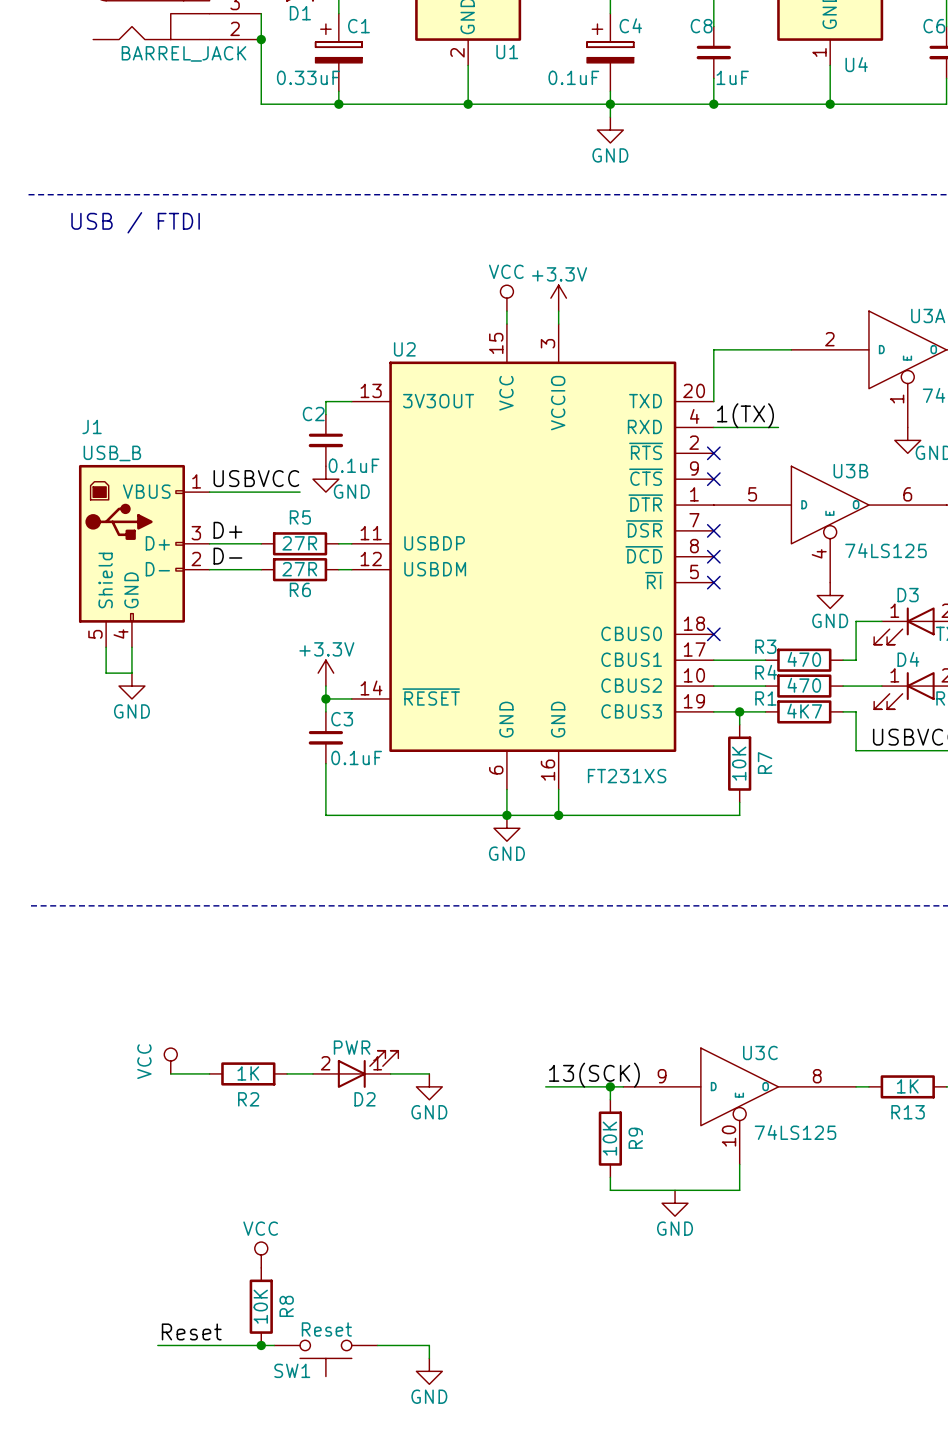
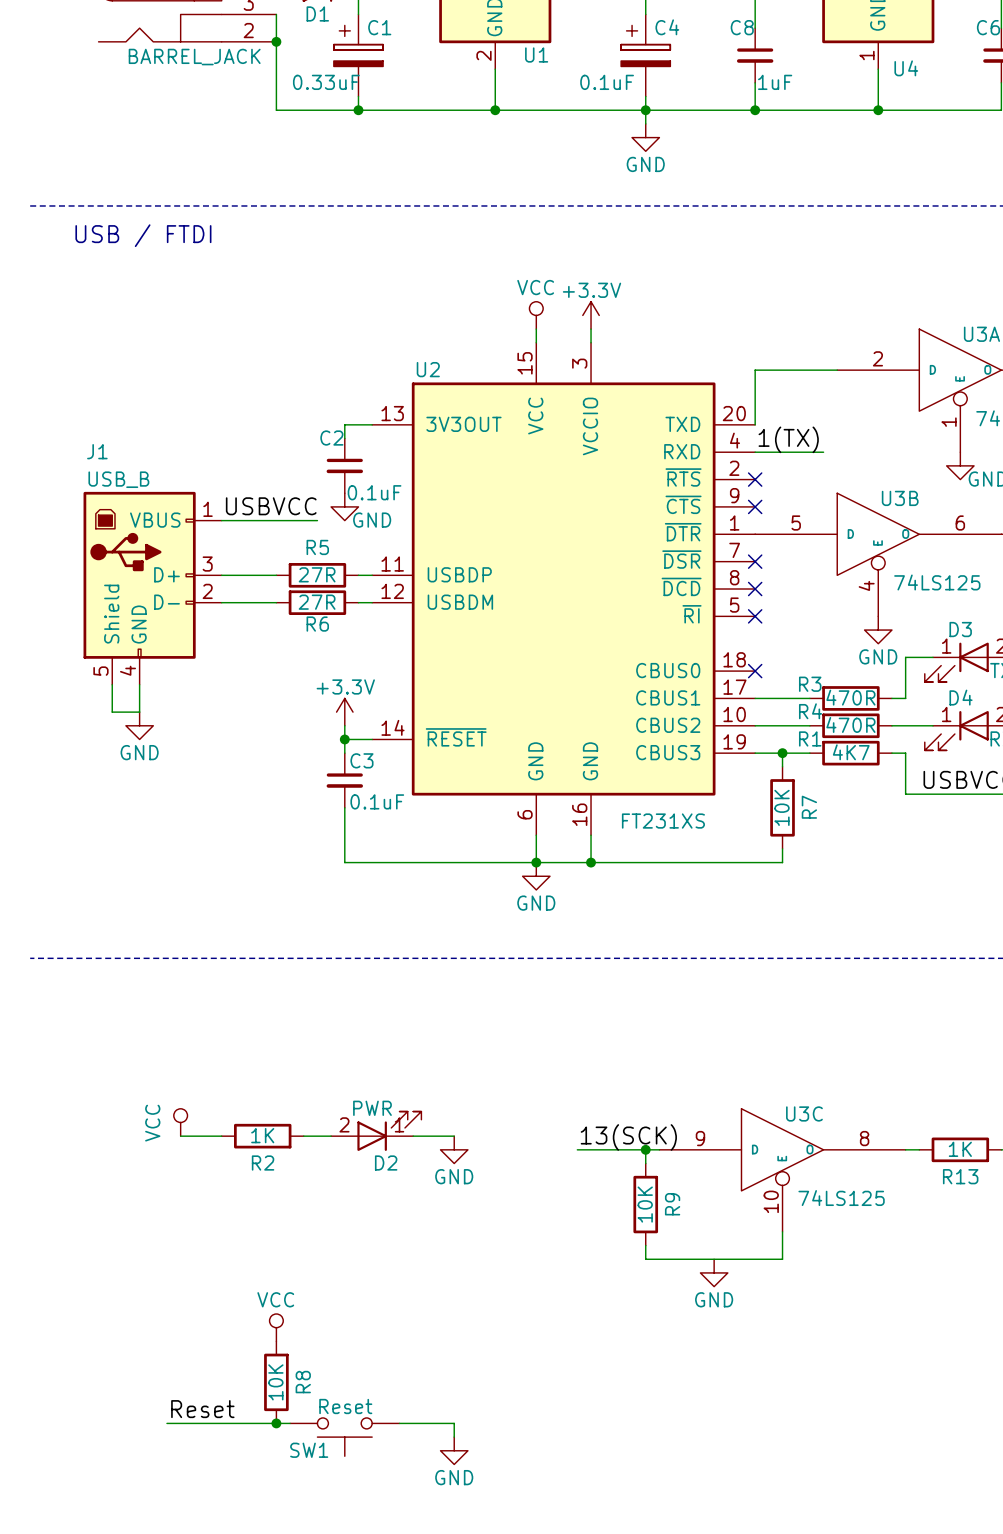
label: D+ (227, 530) -> none
label: D- (227, 556) -> none
R3 value: 470 (804, 659) -> 470R (850, 697)
R4 value: 470 (804, 685) -> 470R (850, 724)

